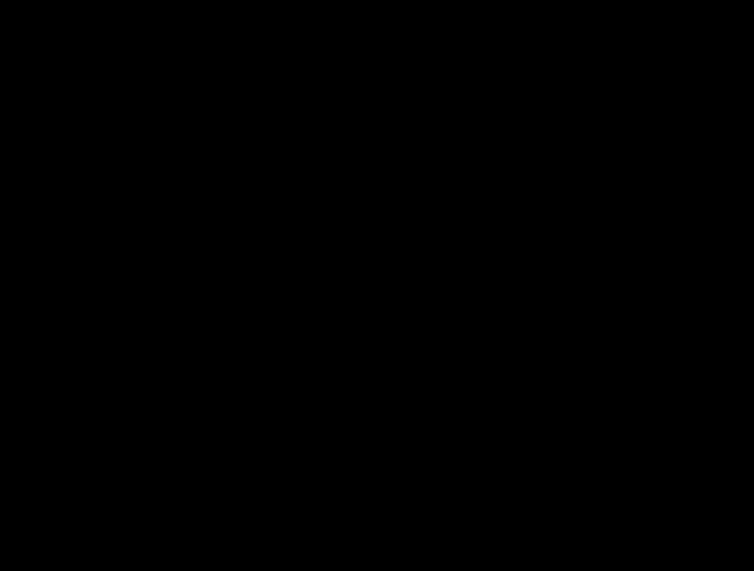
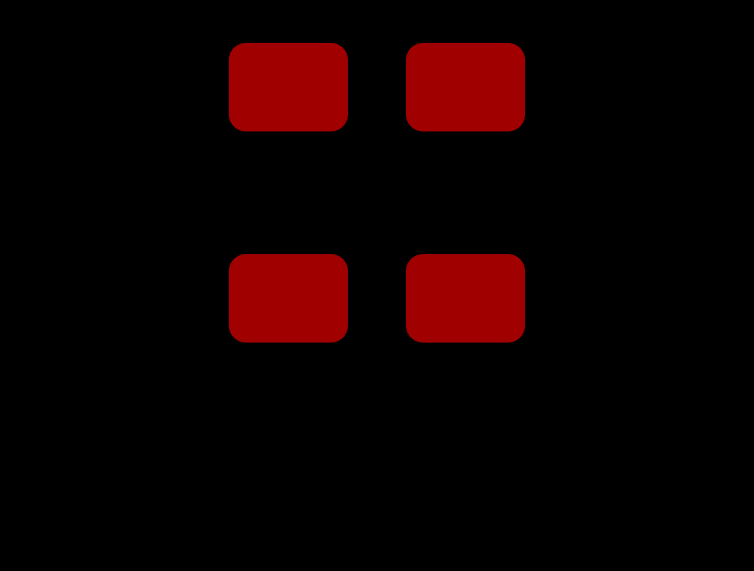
part: none -> (288, 192)
part: none -> (465, 192)

